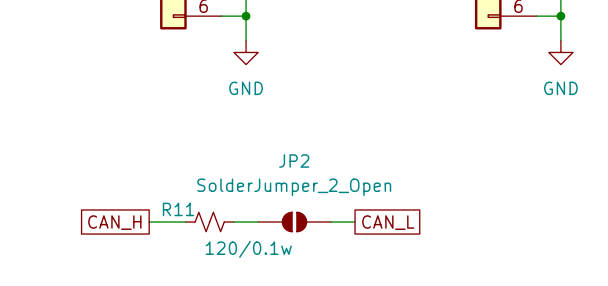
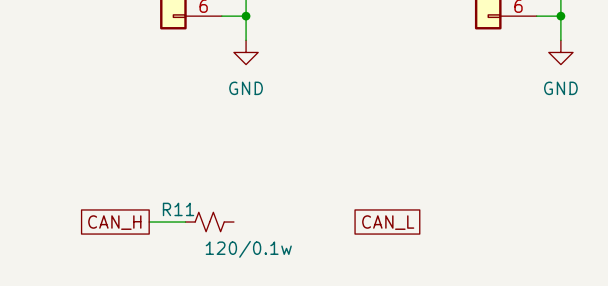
wire: (233, 222) (258, 222) -> none
JP2: SolderJumper_2_Open (294, 222) -> none
wire: (330, 222) (355, 222) -> none

